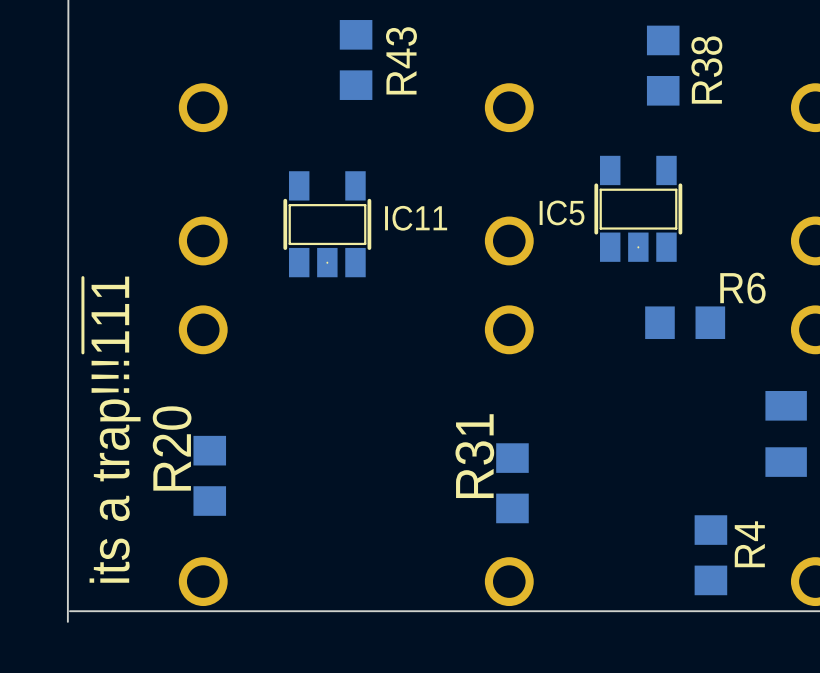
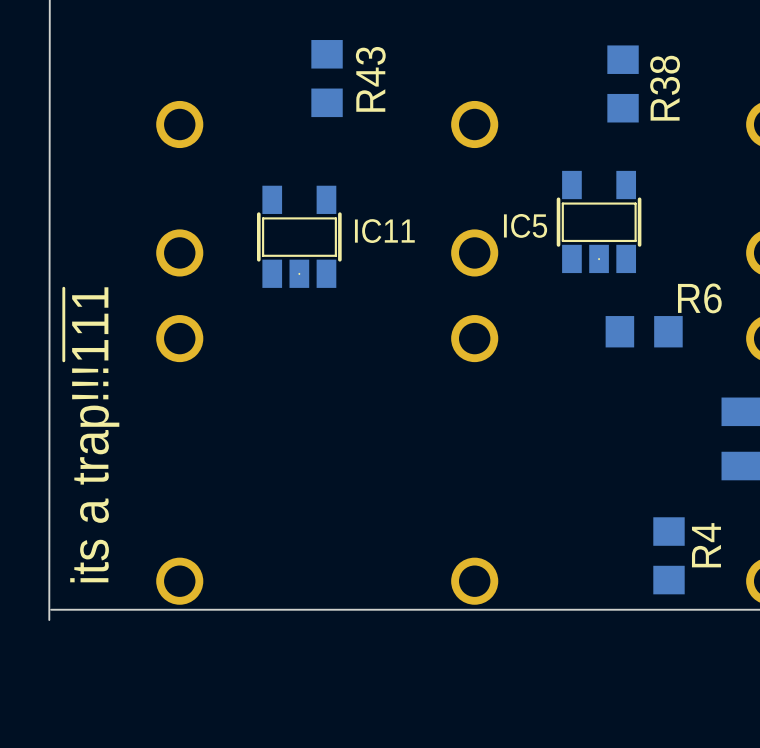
R20: (209, 475) -> none
R31: (512, 483) -> none

